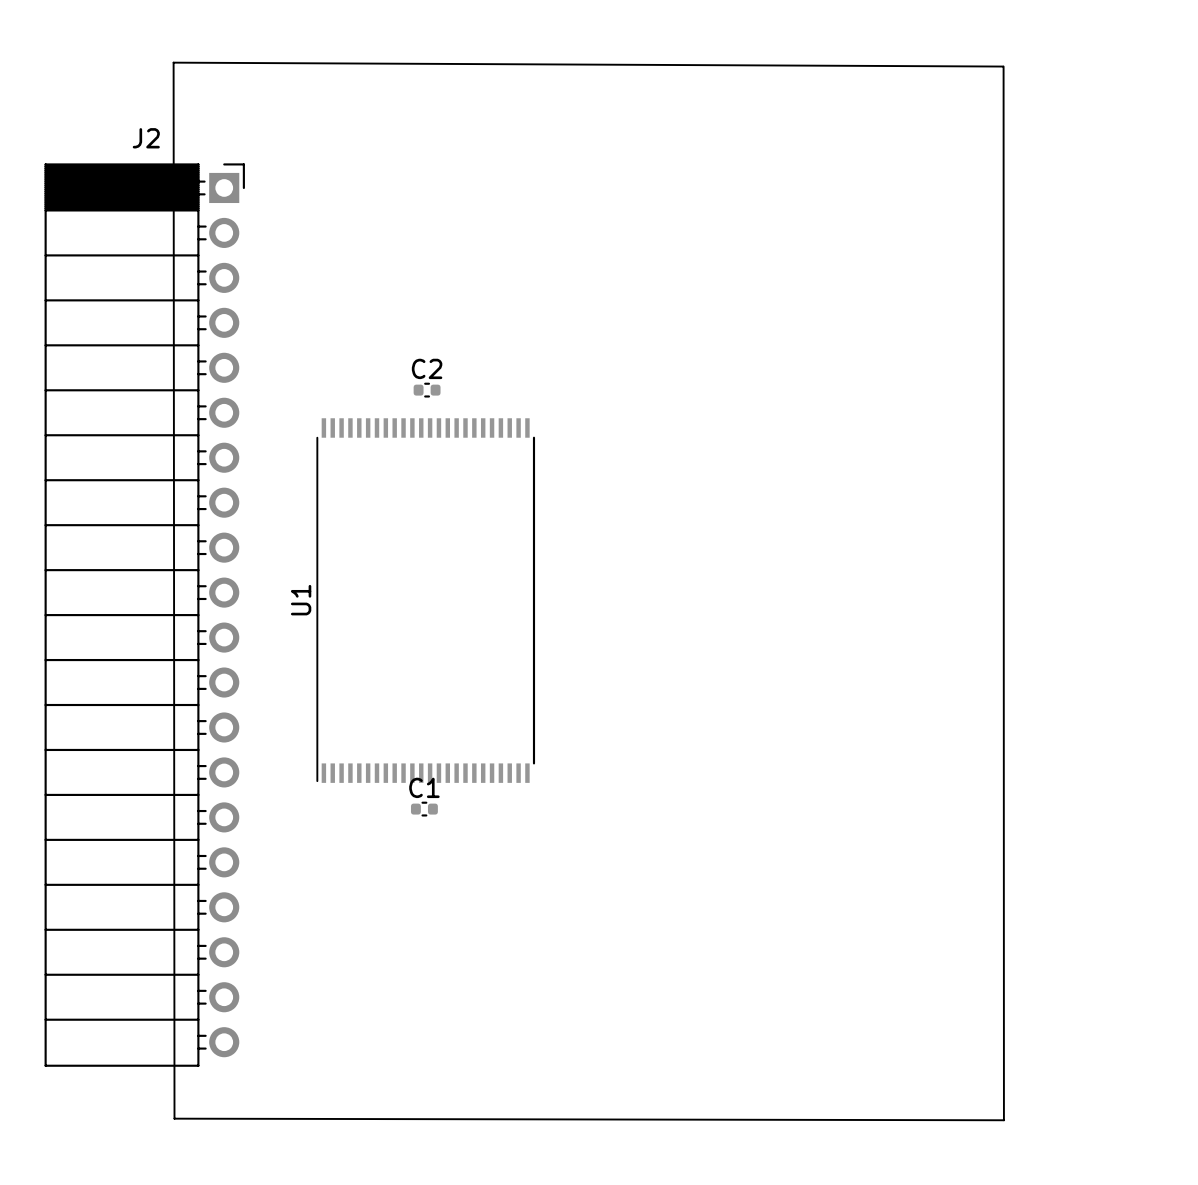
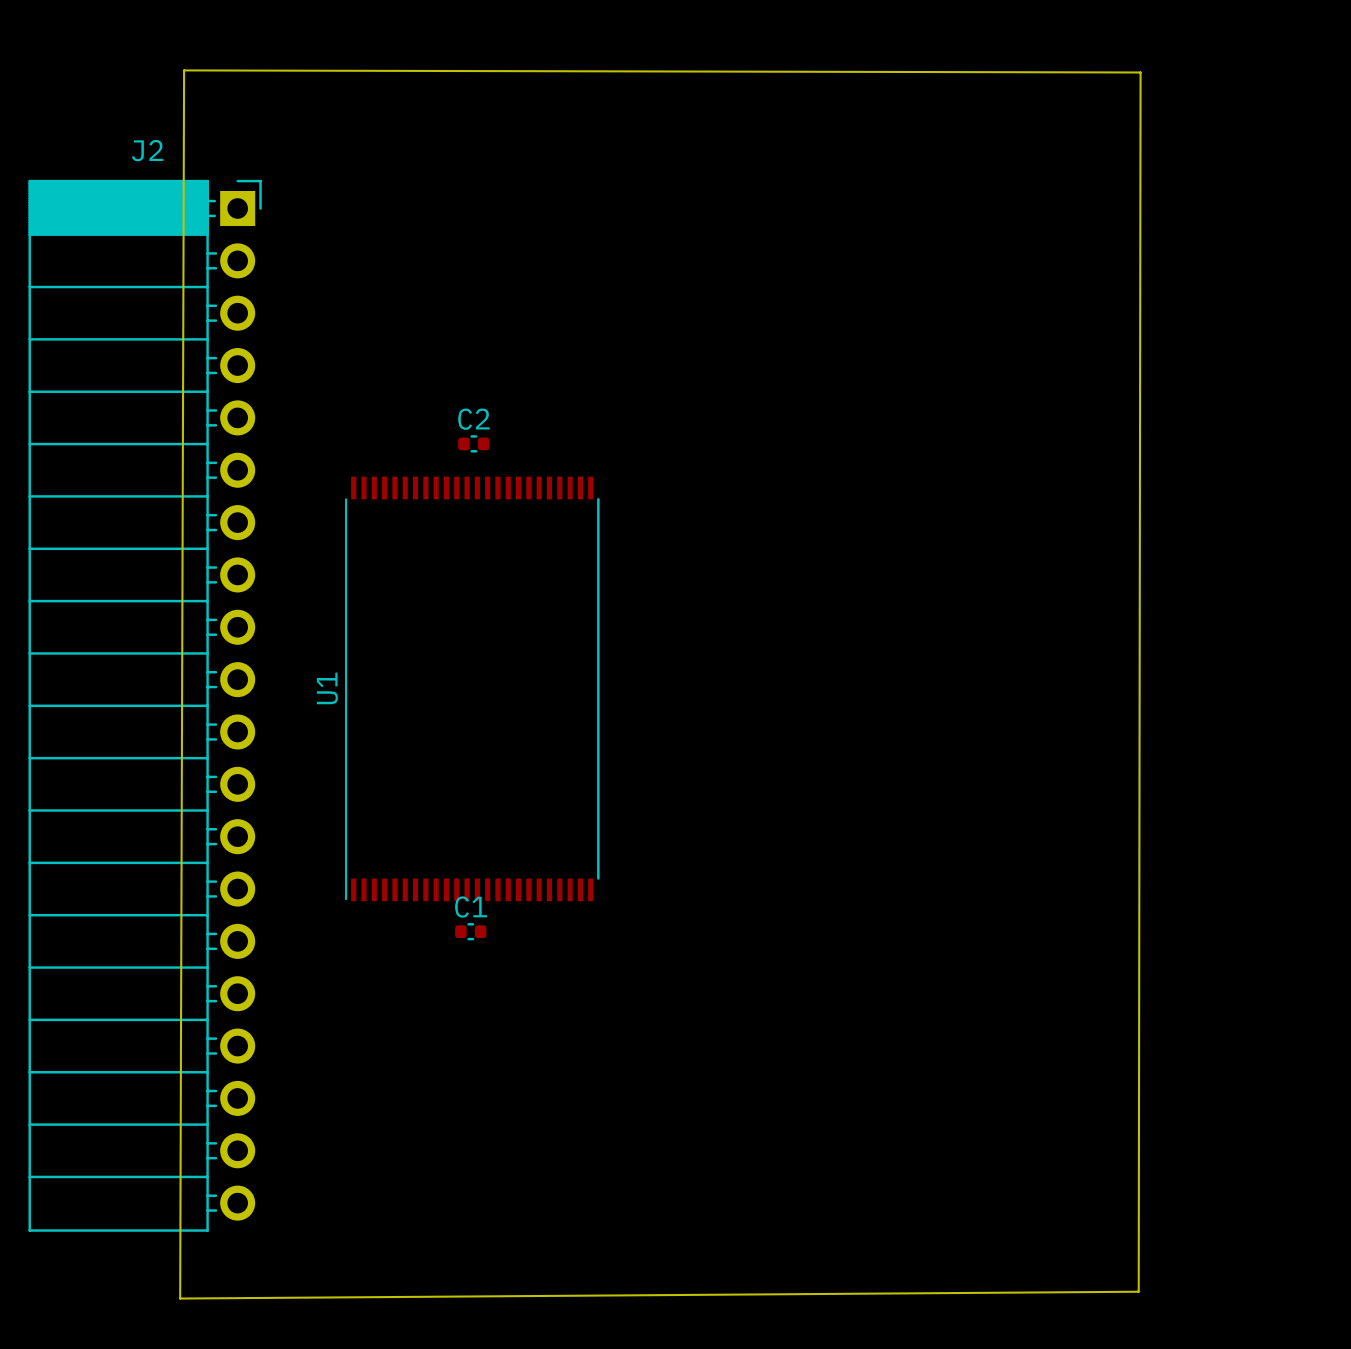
board edge: (1003, 66) (173, 62) (174, 1118) (1004, 1120) -> none
board edge: (1003, 66) (1003, 1120) -> none
board edge: none -> (184, 70) (1140, 72) (1138, 1291) (180, 1298) (184, 70)

